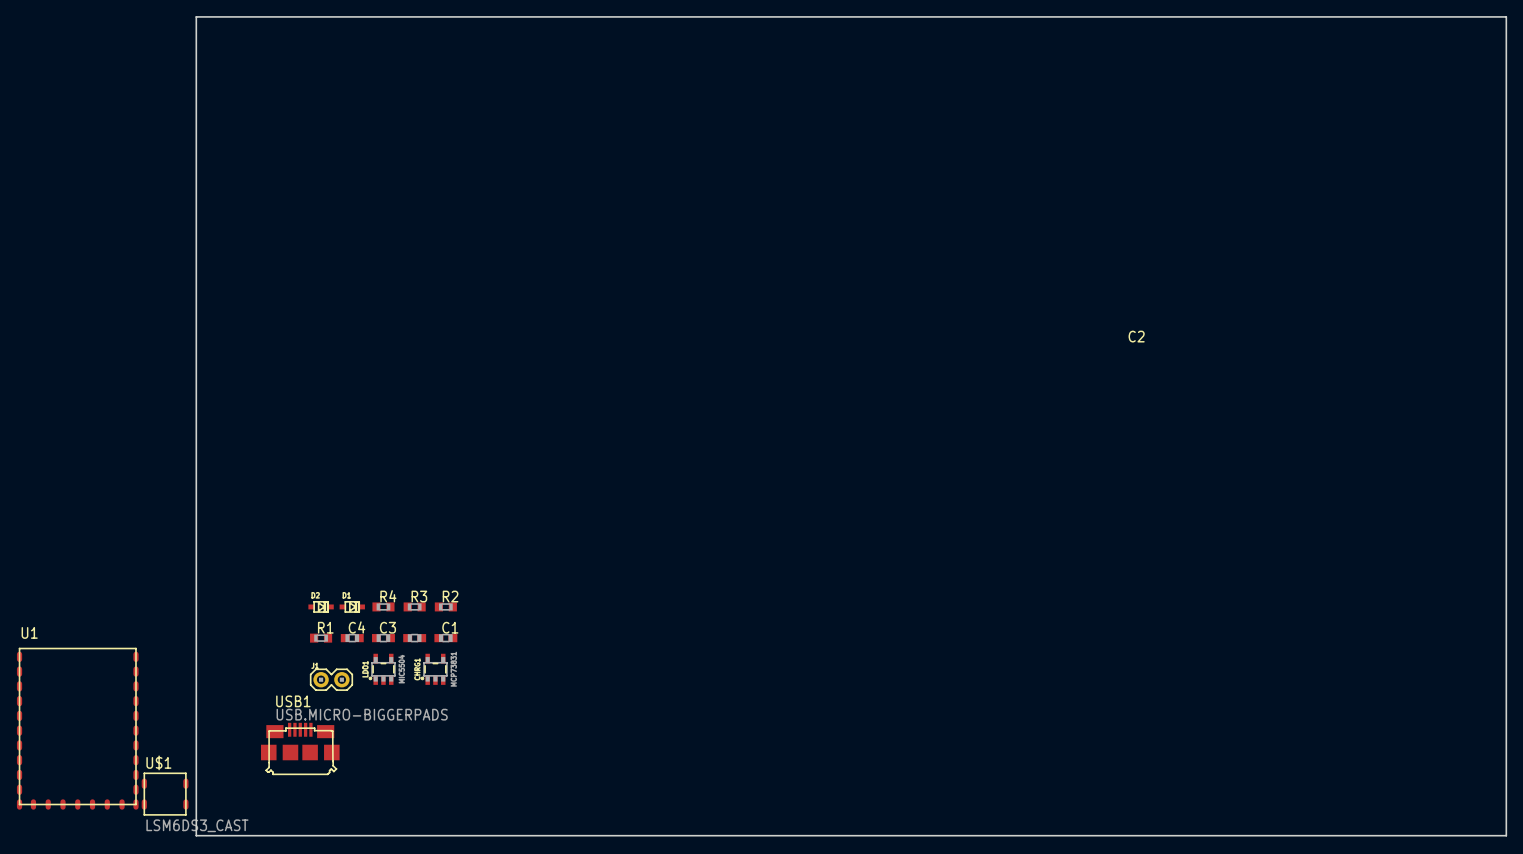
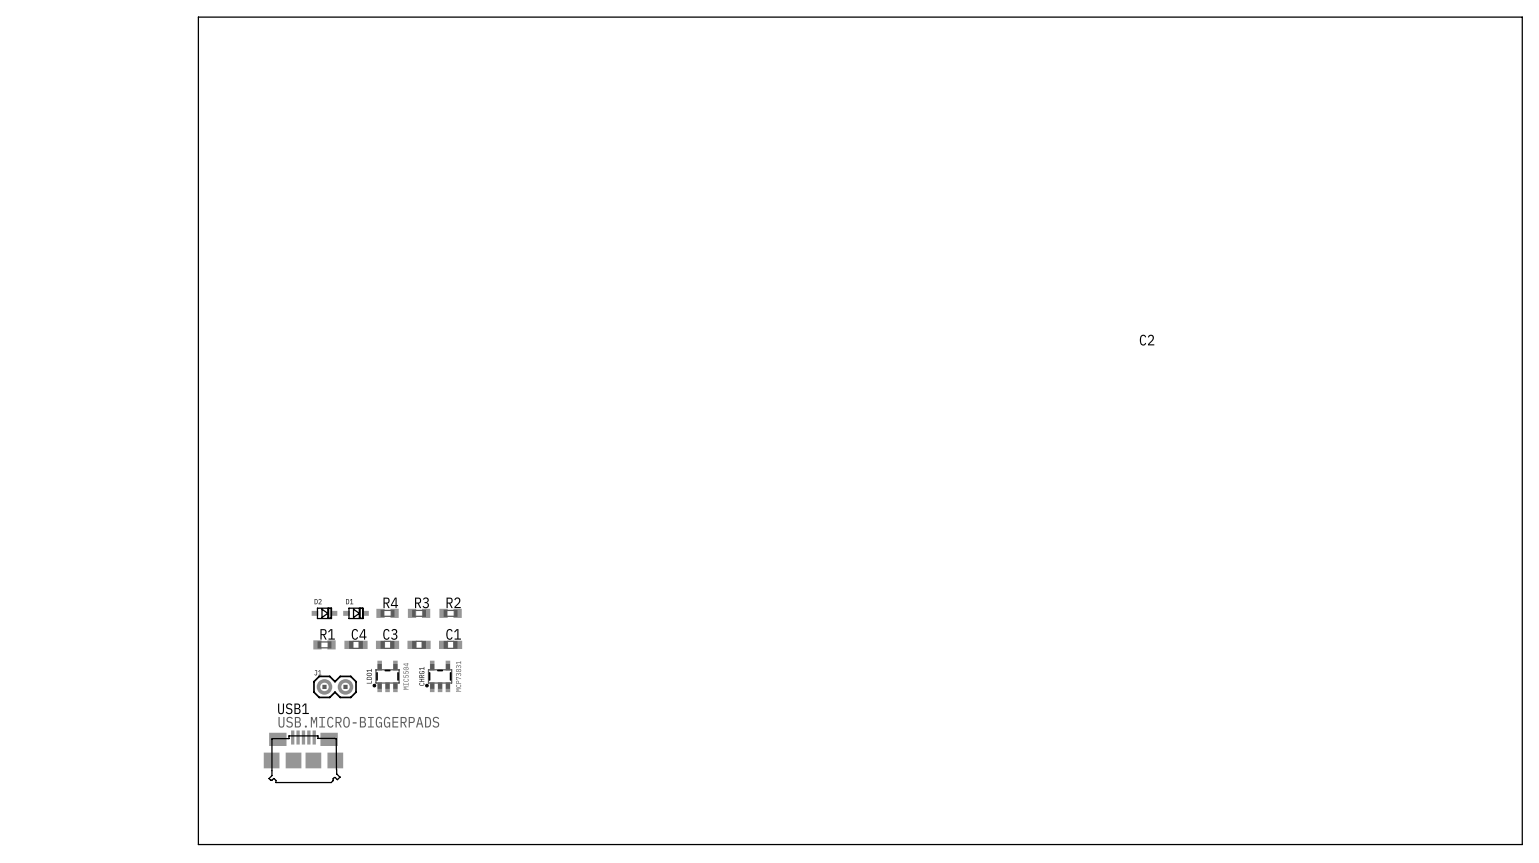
U1: (77, 728) -> none
U$1: LSM6DS3_CAST (165, 794) -> none

